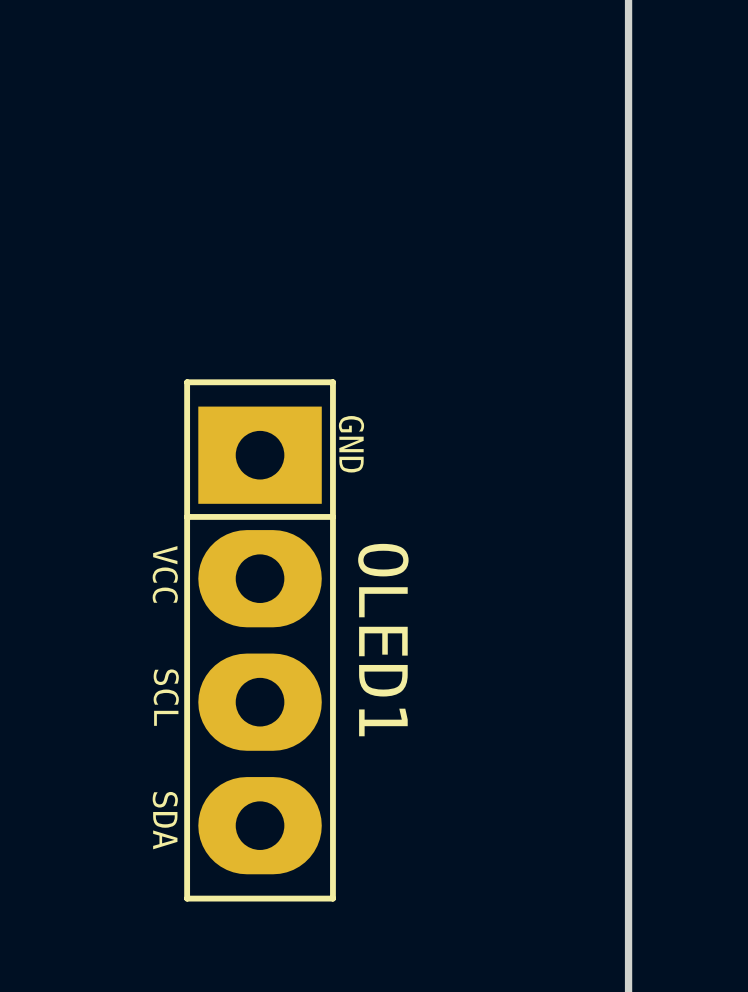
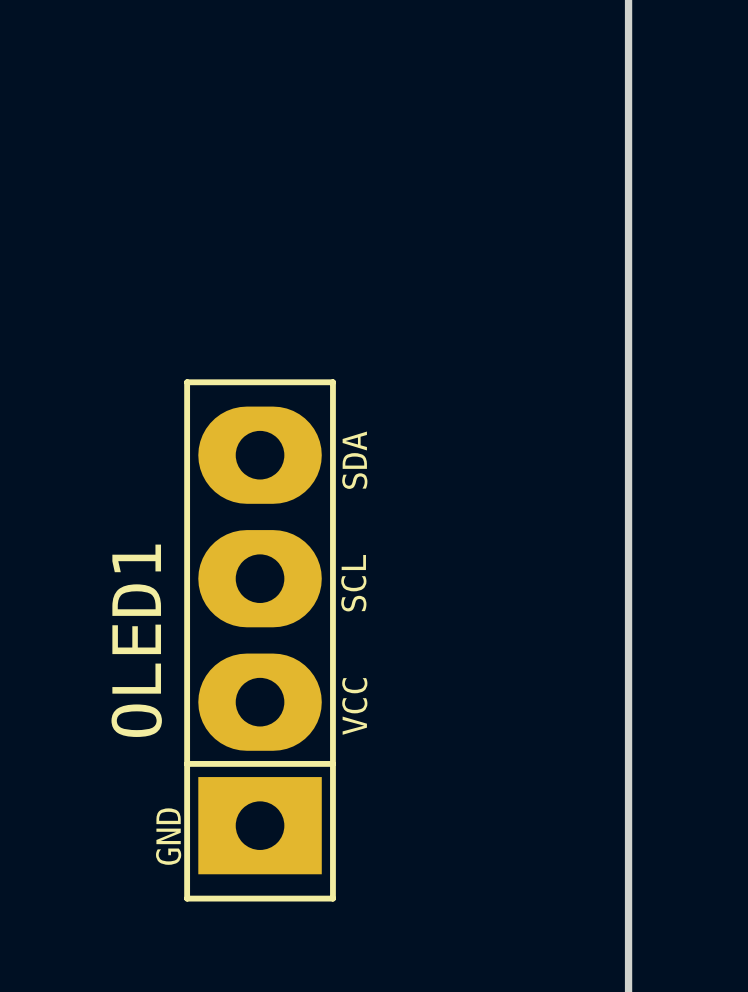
OLED1 rotation: 0° (260, 640) -> 180° (260, 640)

